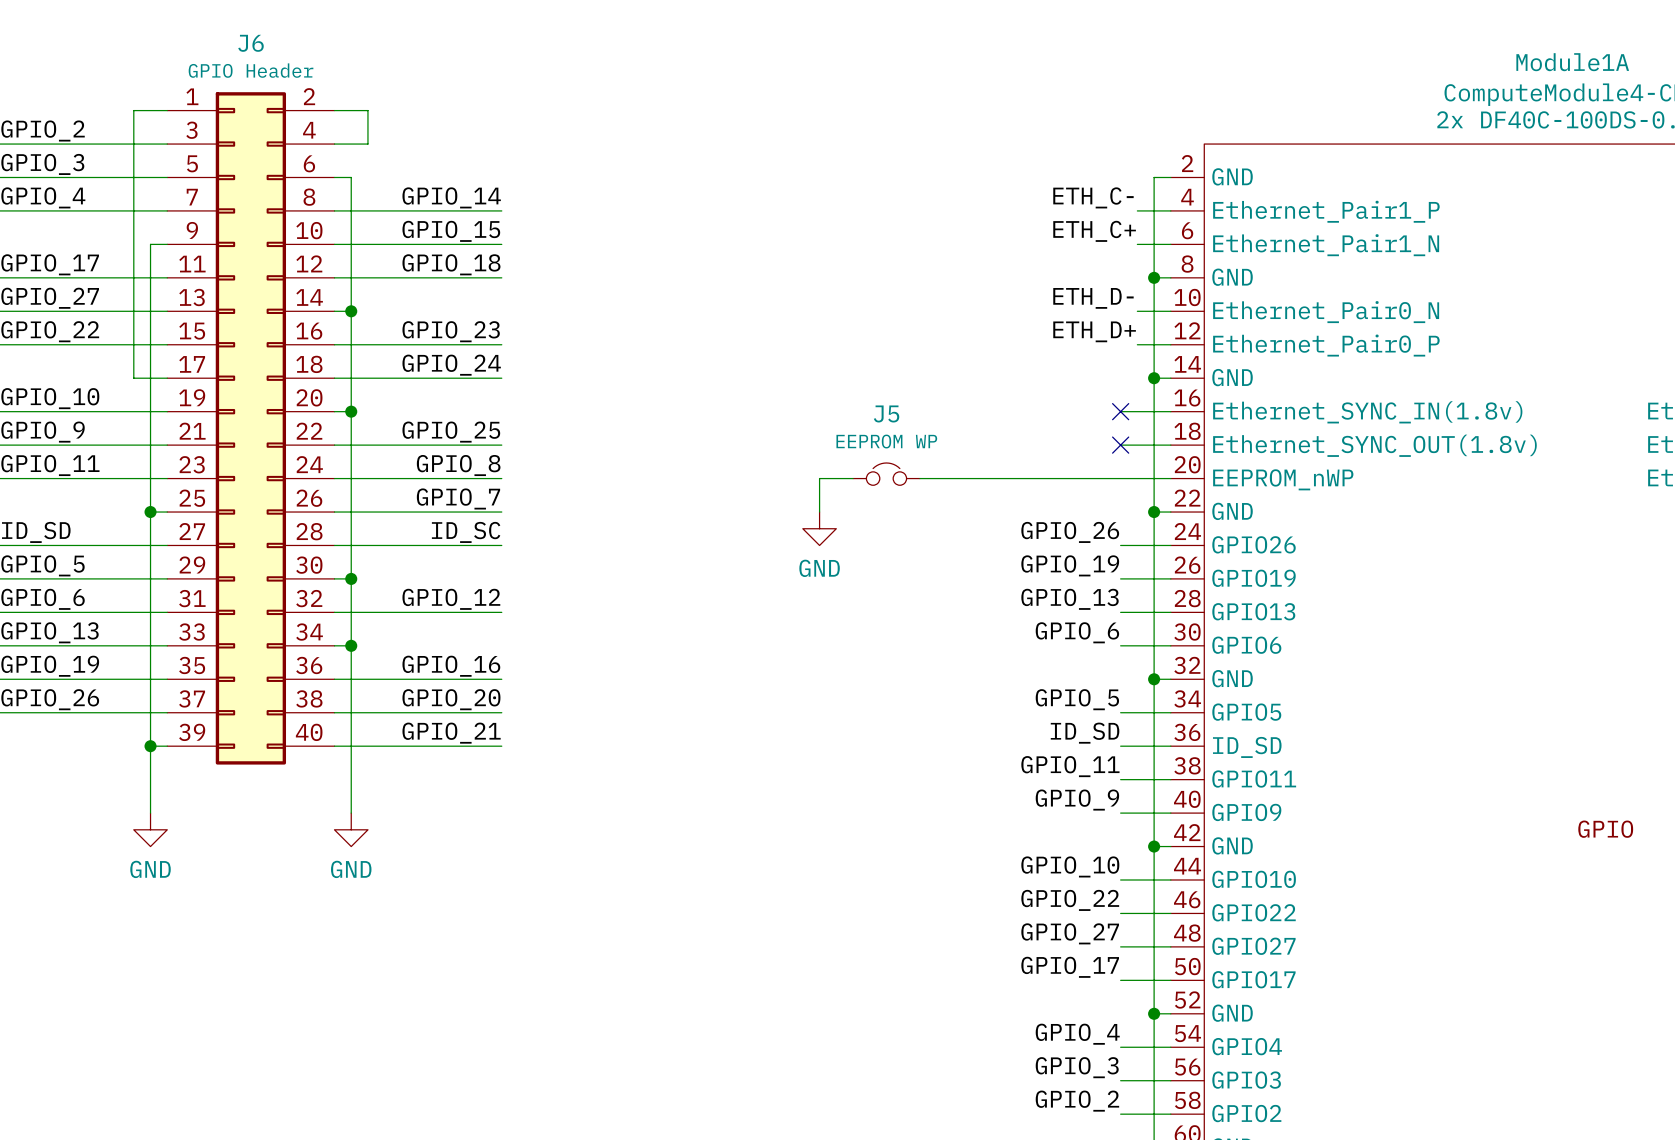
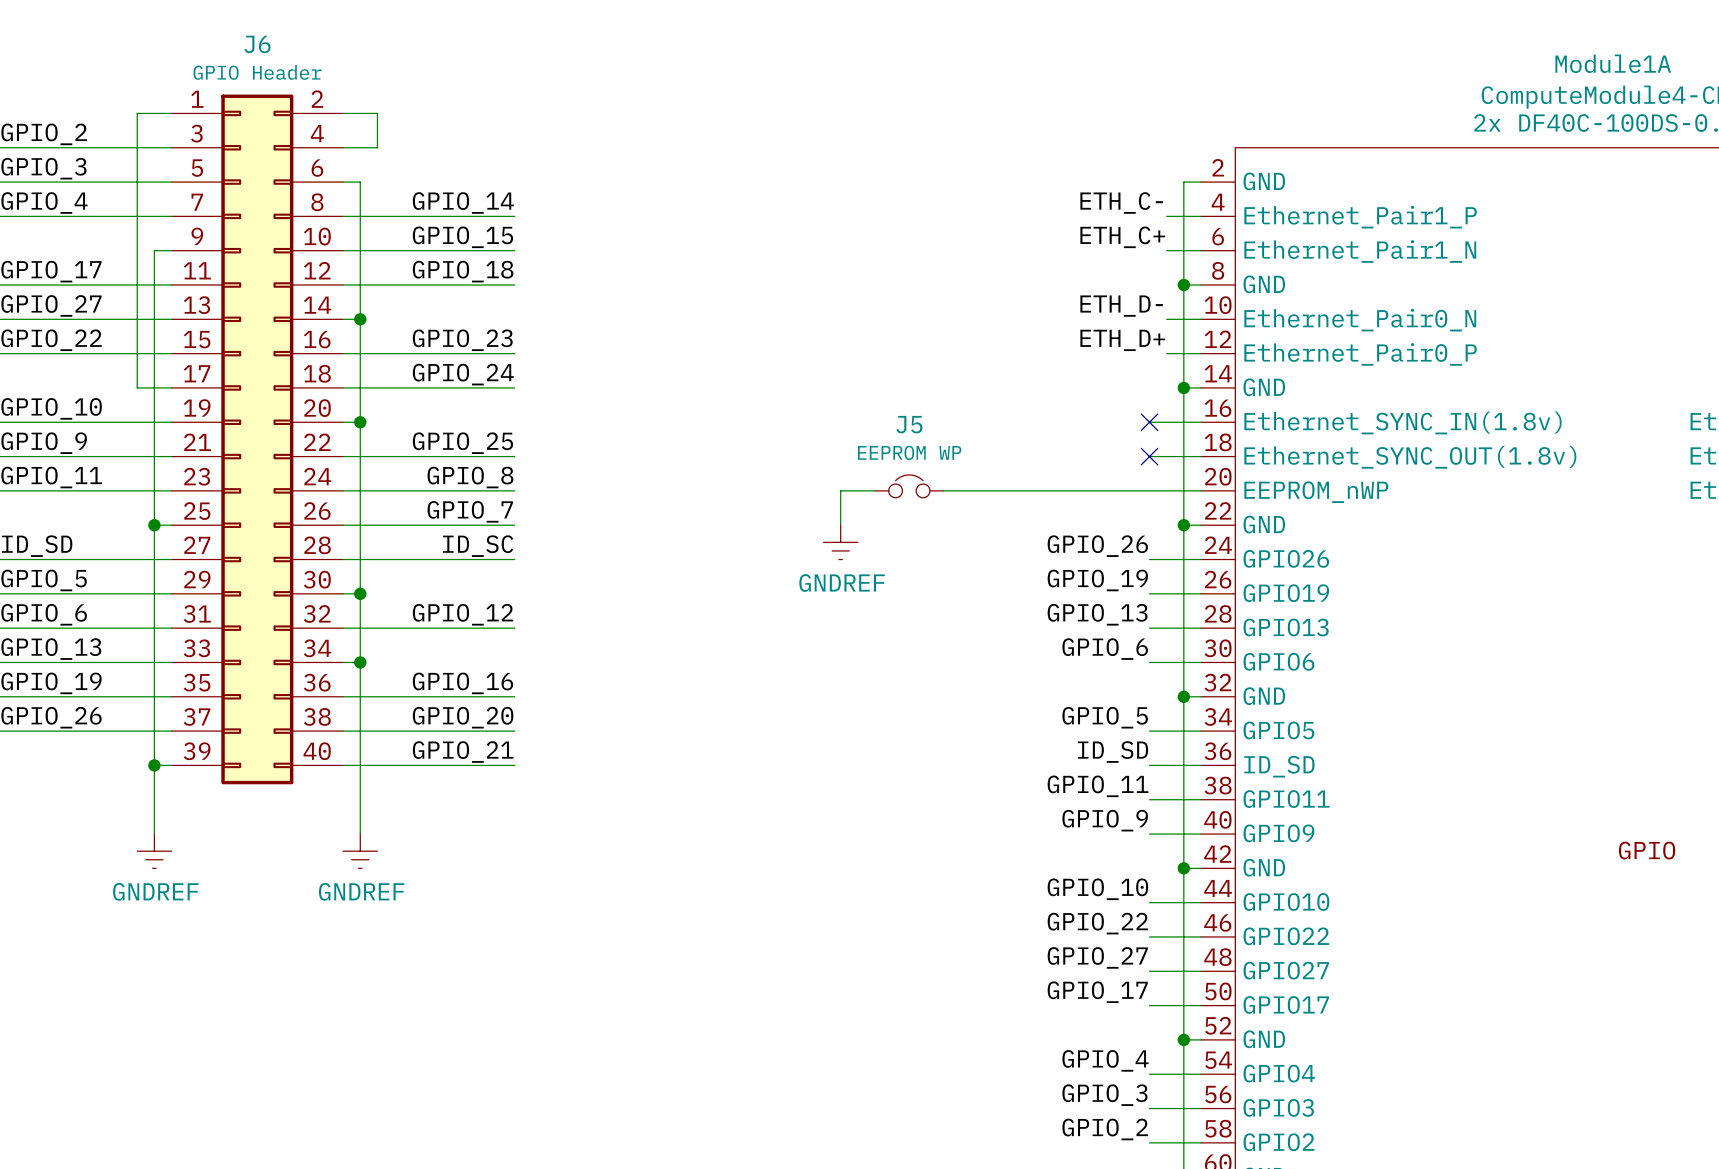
power symbol: GND (819, 528) -> GNDREF (840, 542)
power symbol: GND (150, 829) -> GNDREF (154, 851)
power symbol: GND (351, 829) -> GNDREF (360, 851)

